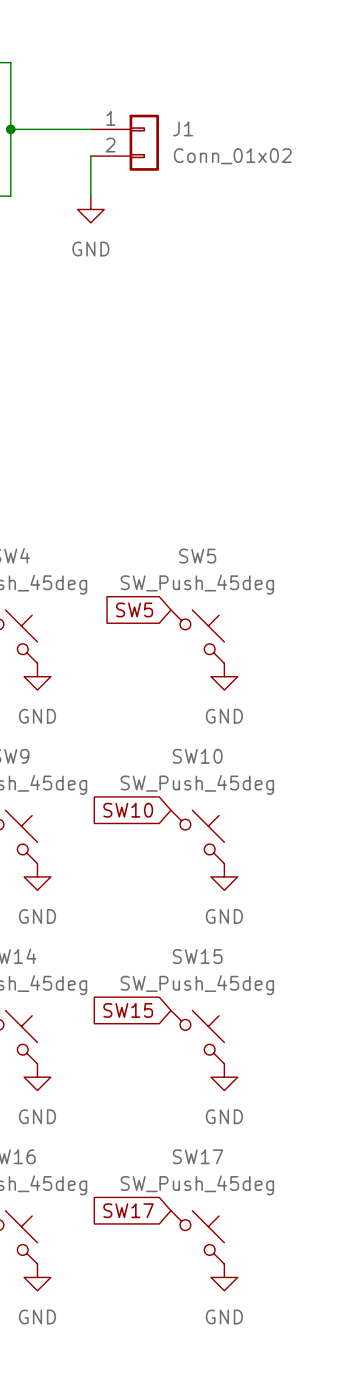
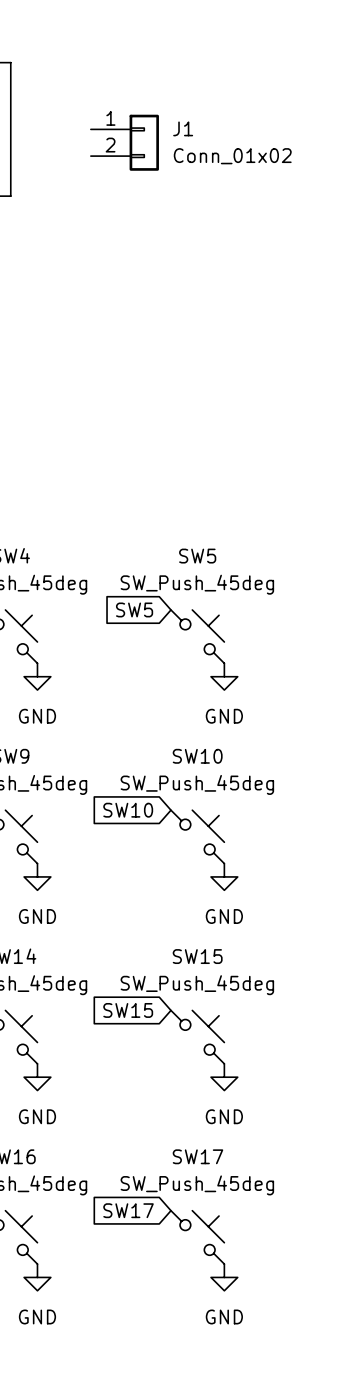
wire: (10, 129) (90, 129) -> none
junction: (10, 129) -> none
wire: (90, 156) (90, 196) -> none
power symbol: GND (90, 209) -> none

